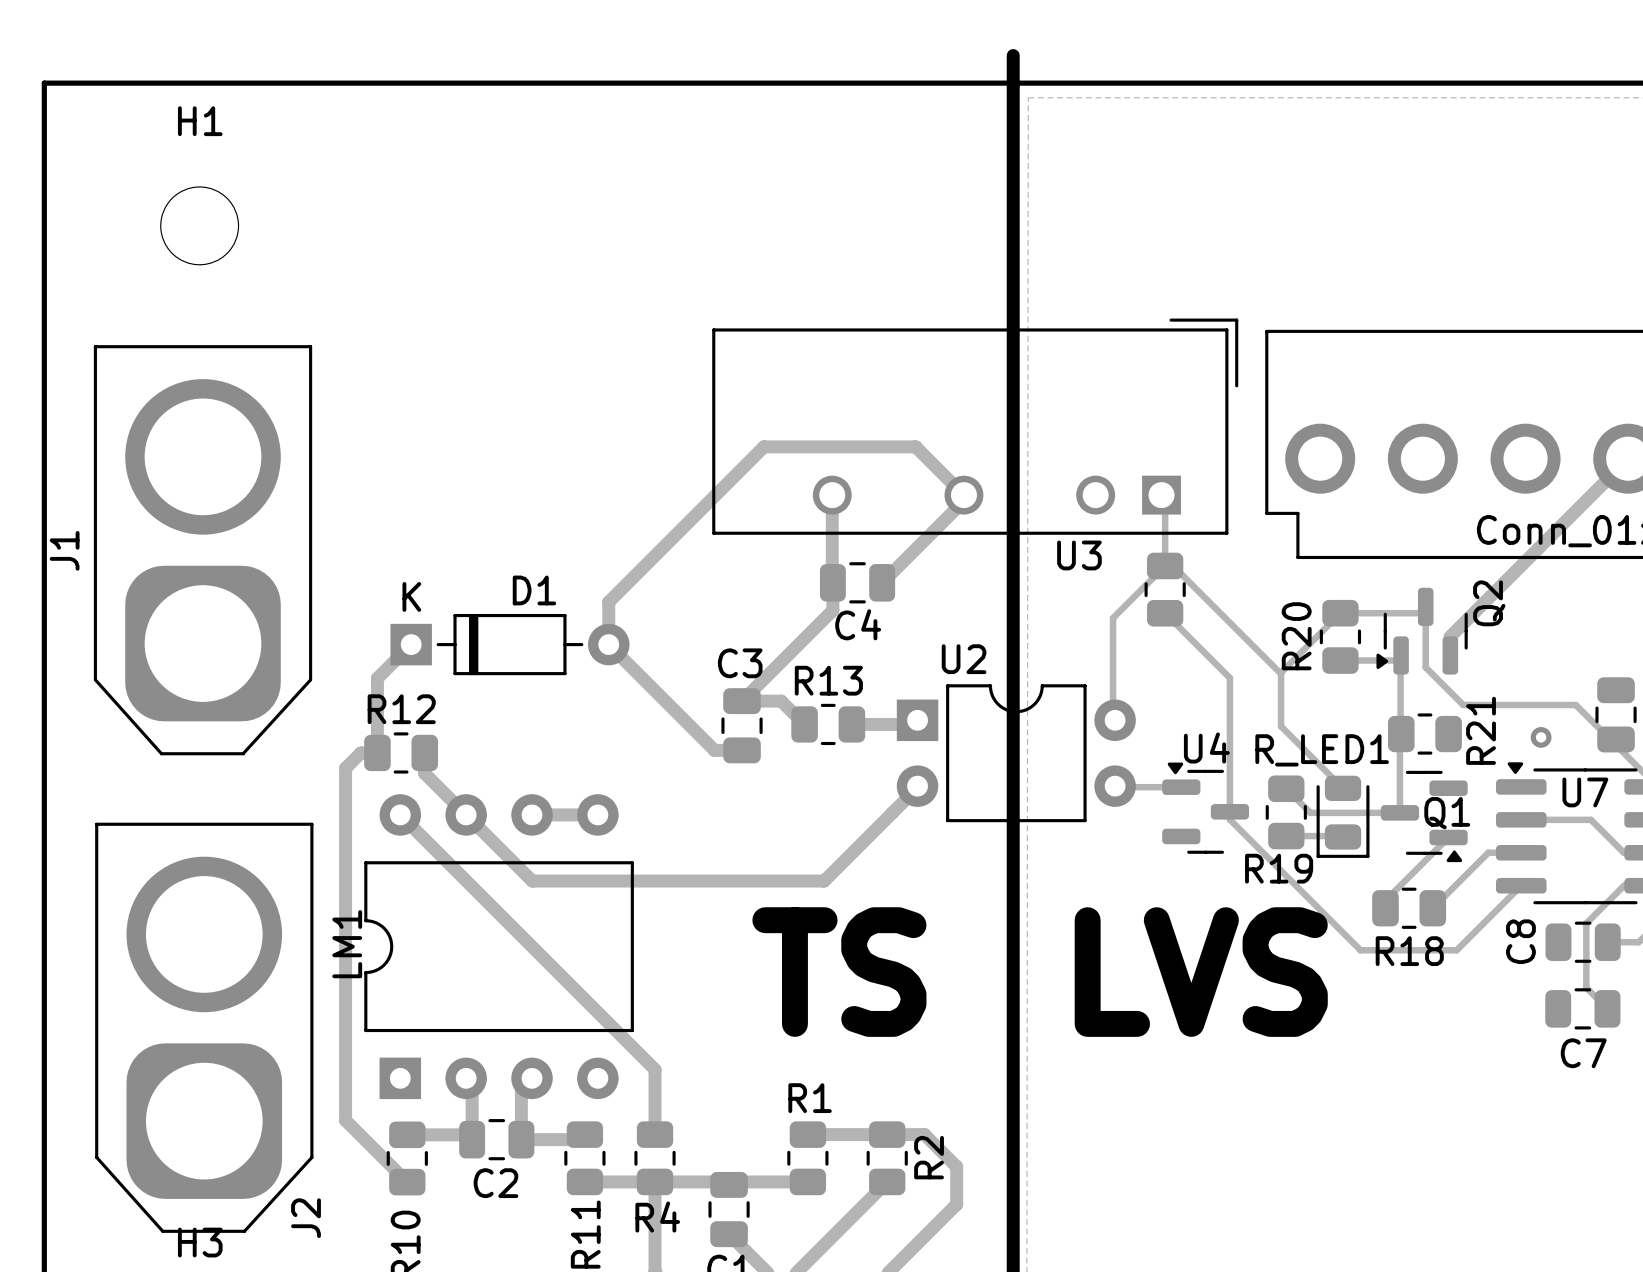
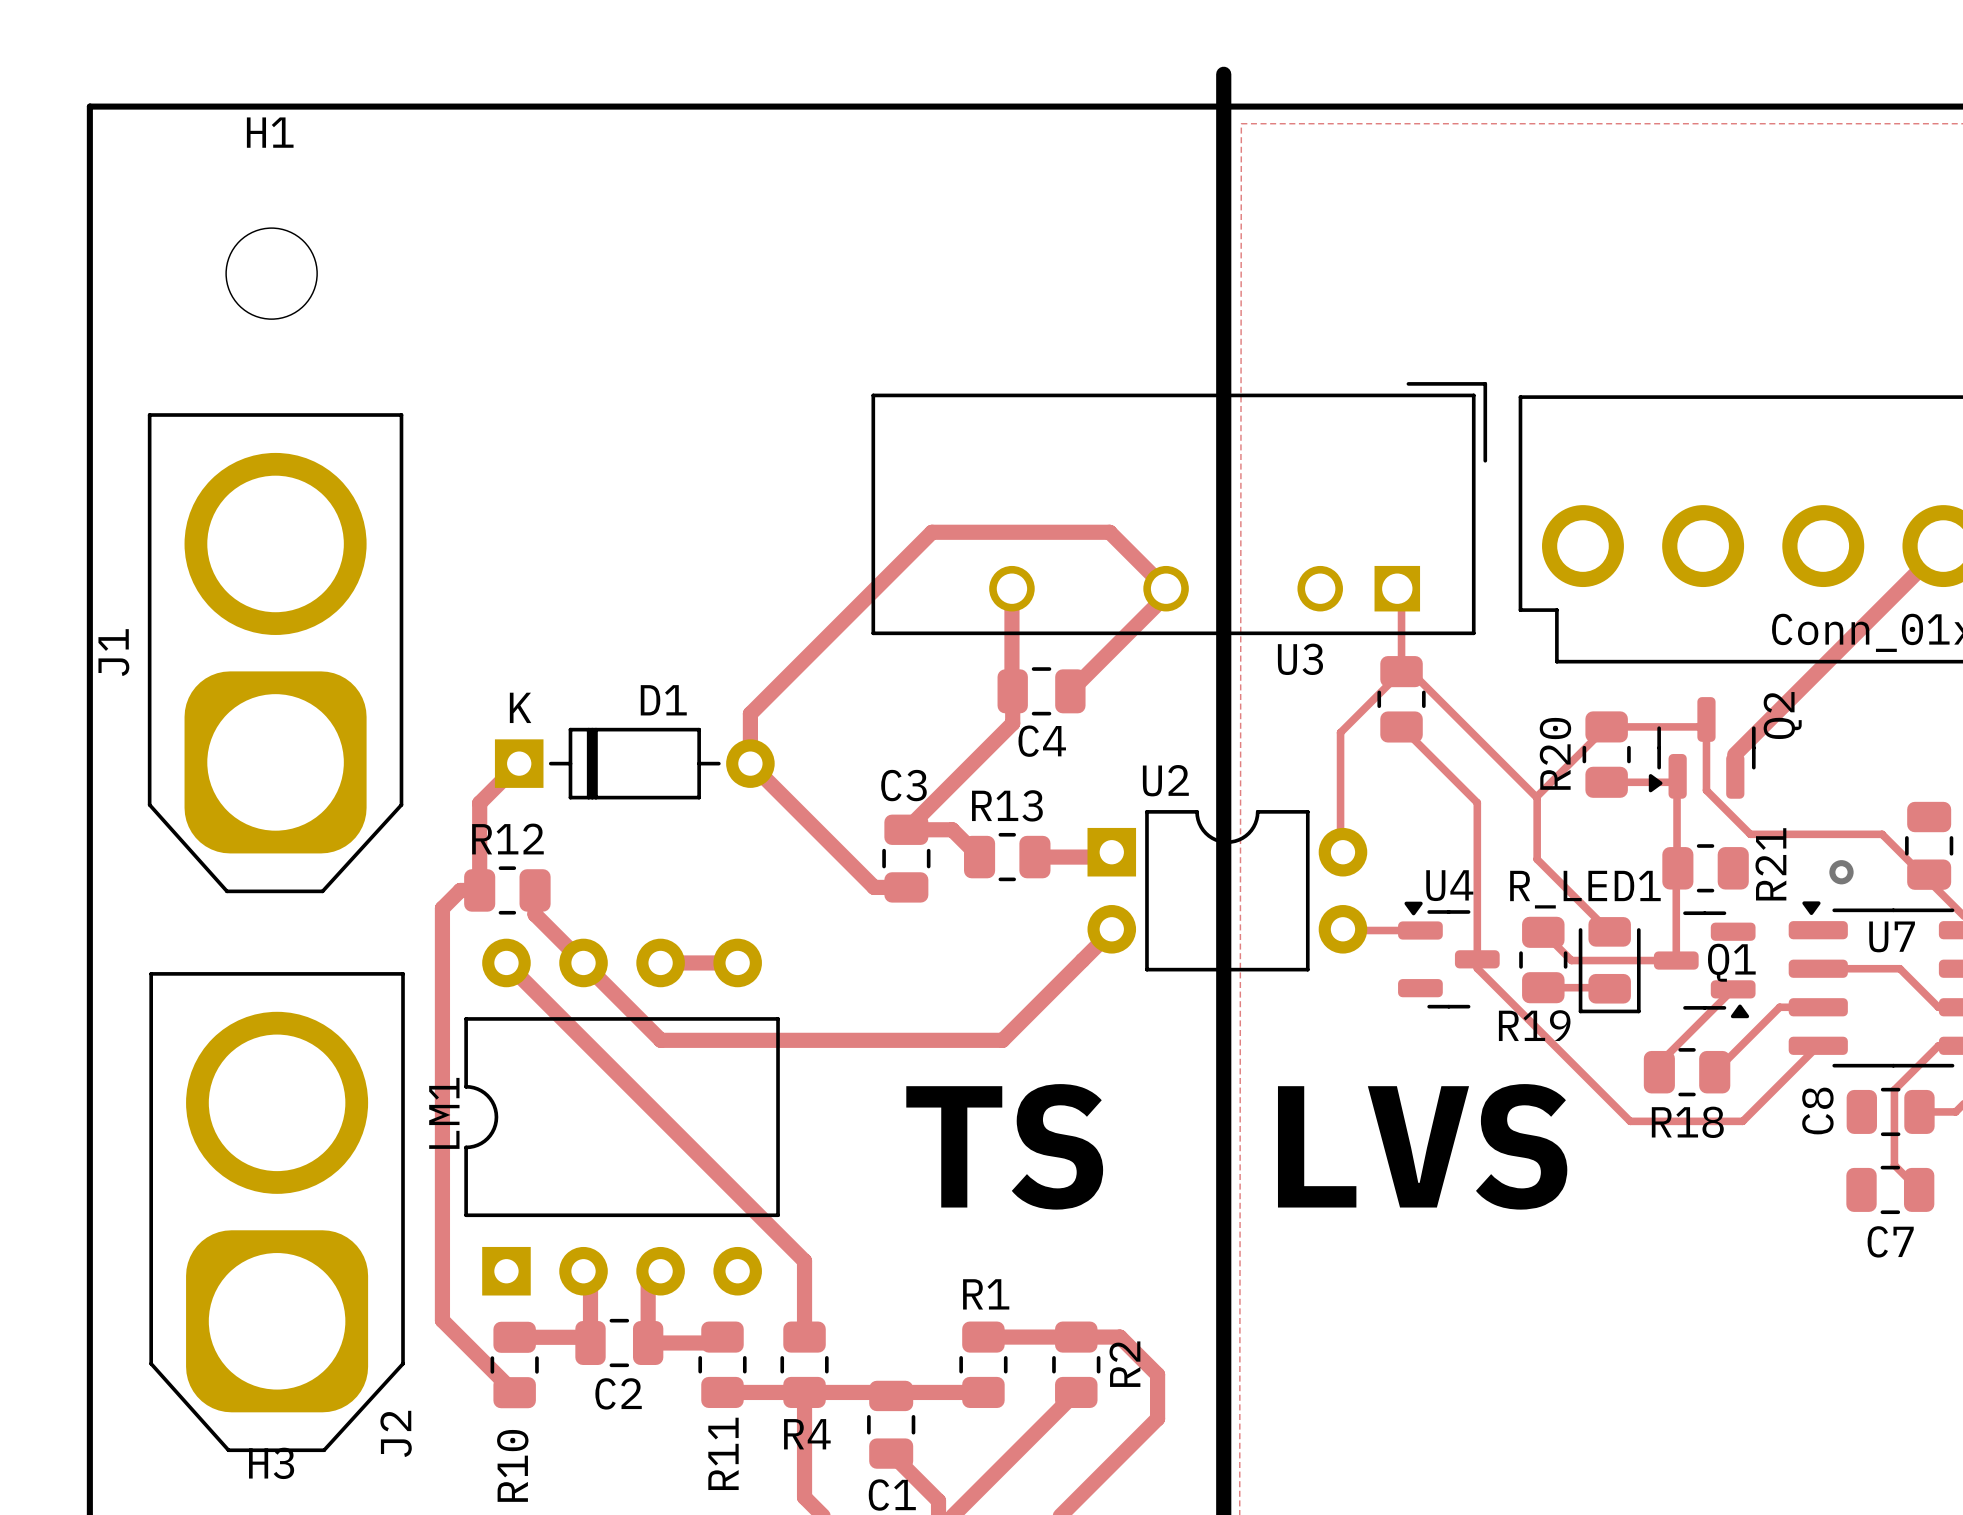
H1 name position: H1 (200, 121) -> H1 (270, 132)

